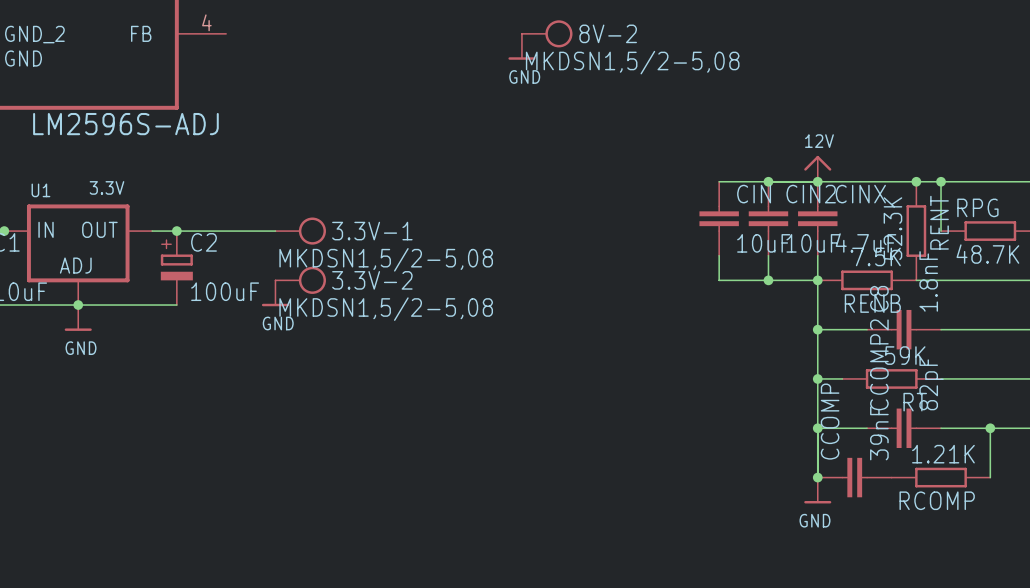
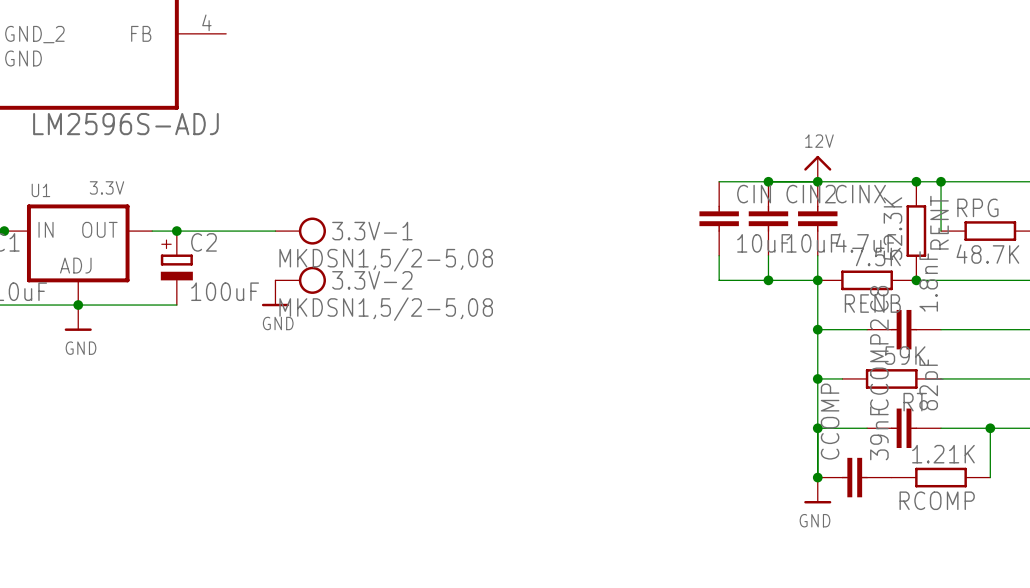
8V-2: MKDSN1,5/2-5,08 (547, 33) -> none
power symbol: GND (521, 46) -> none
junction: none -> (916, 280)

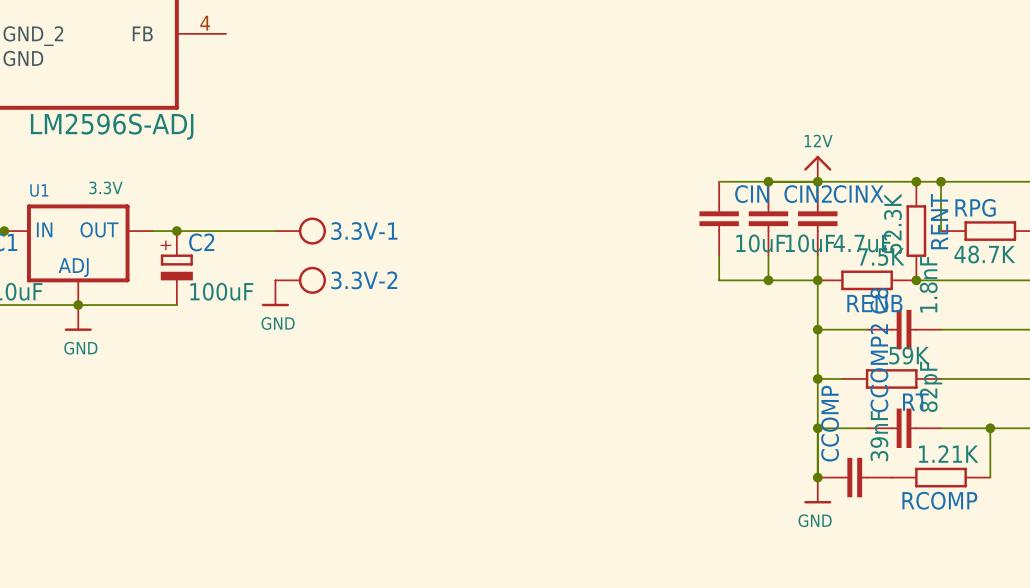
3.3V-1 value: MKDSN1,5/2-5,08 (386, 259) -> none
3.3V-2 value: MKDSN1,5/2-5,08 (386, 309) -> none

